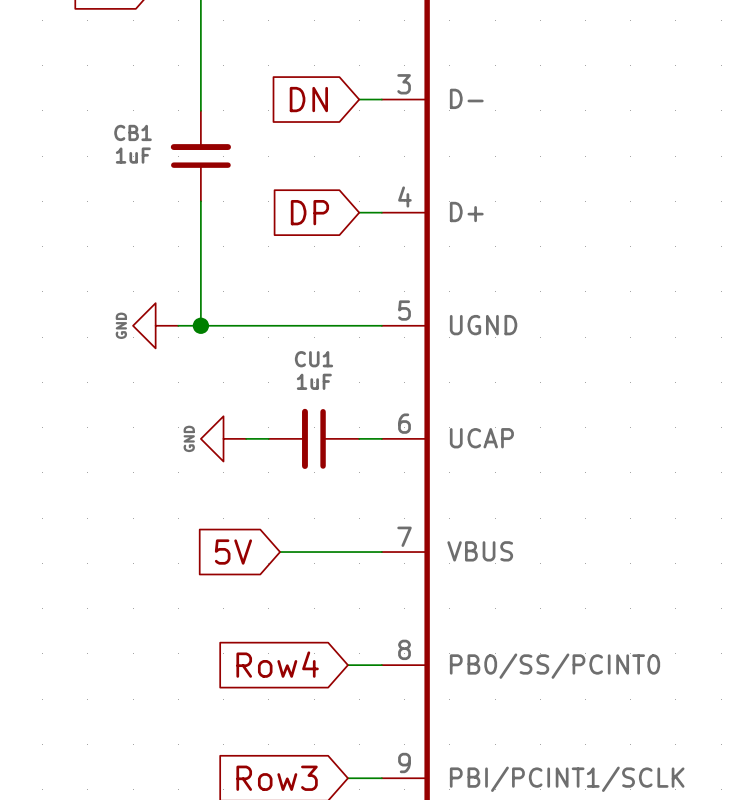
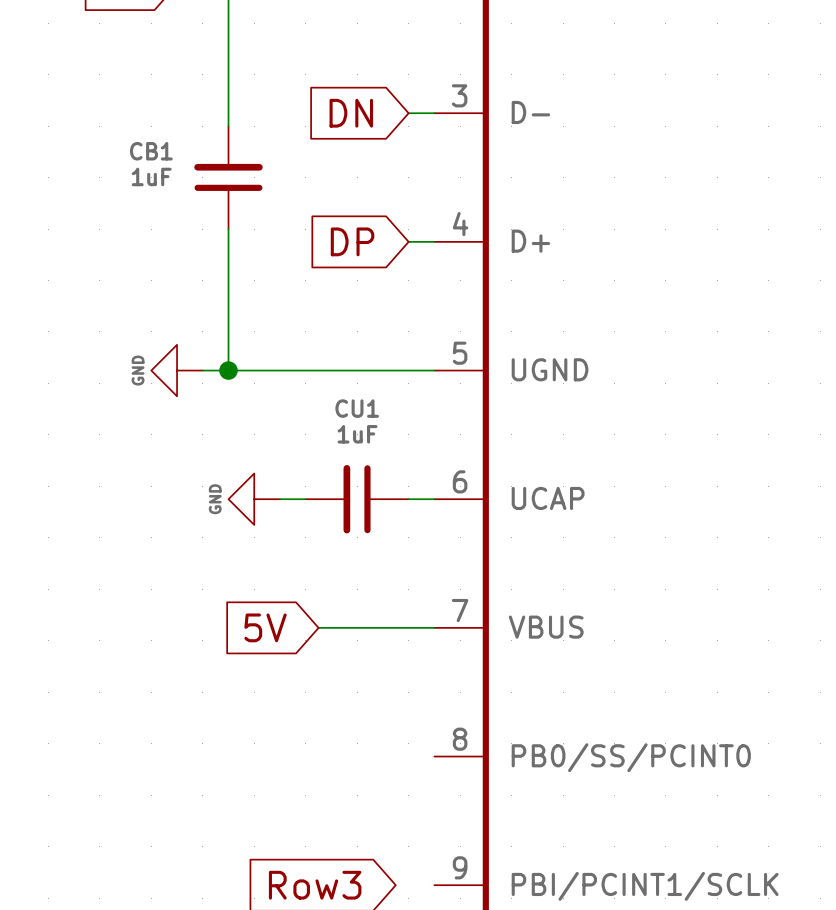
global label: Row4 (277, 664) -> none
wire: (347, 665) (381, 665) -> none
wire: (347, 778) (381, 778) -> none

